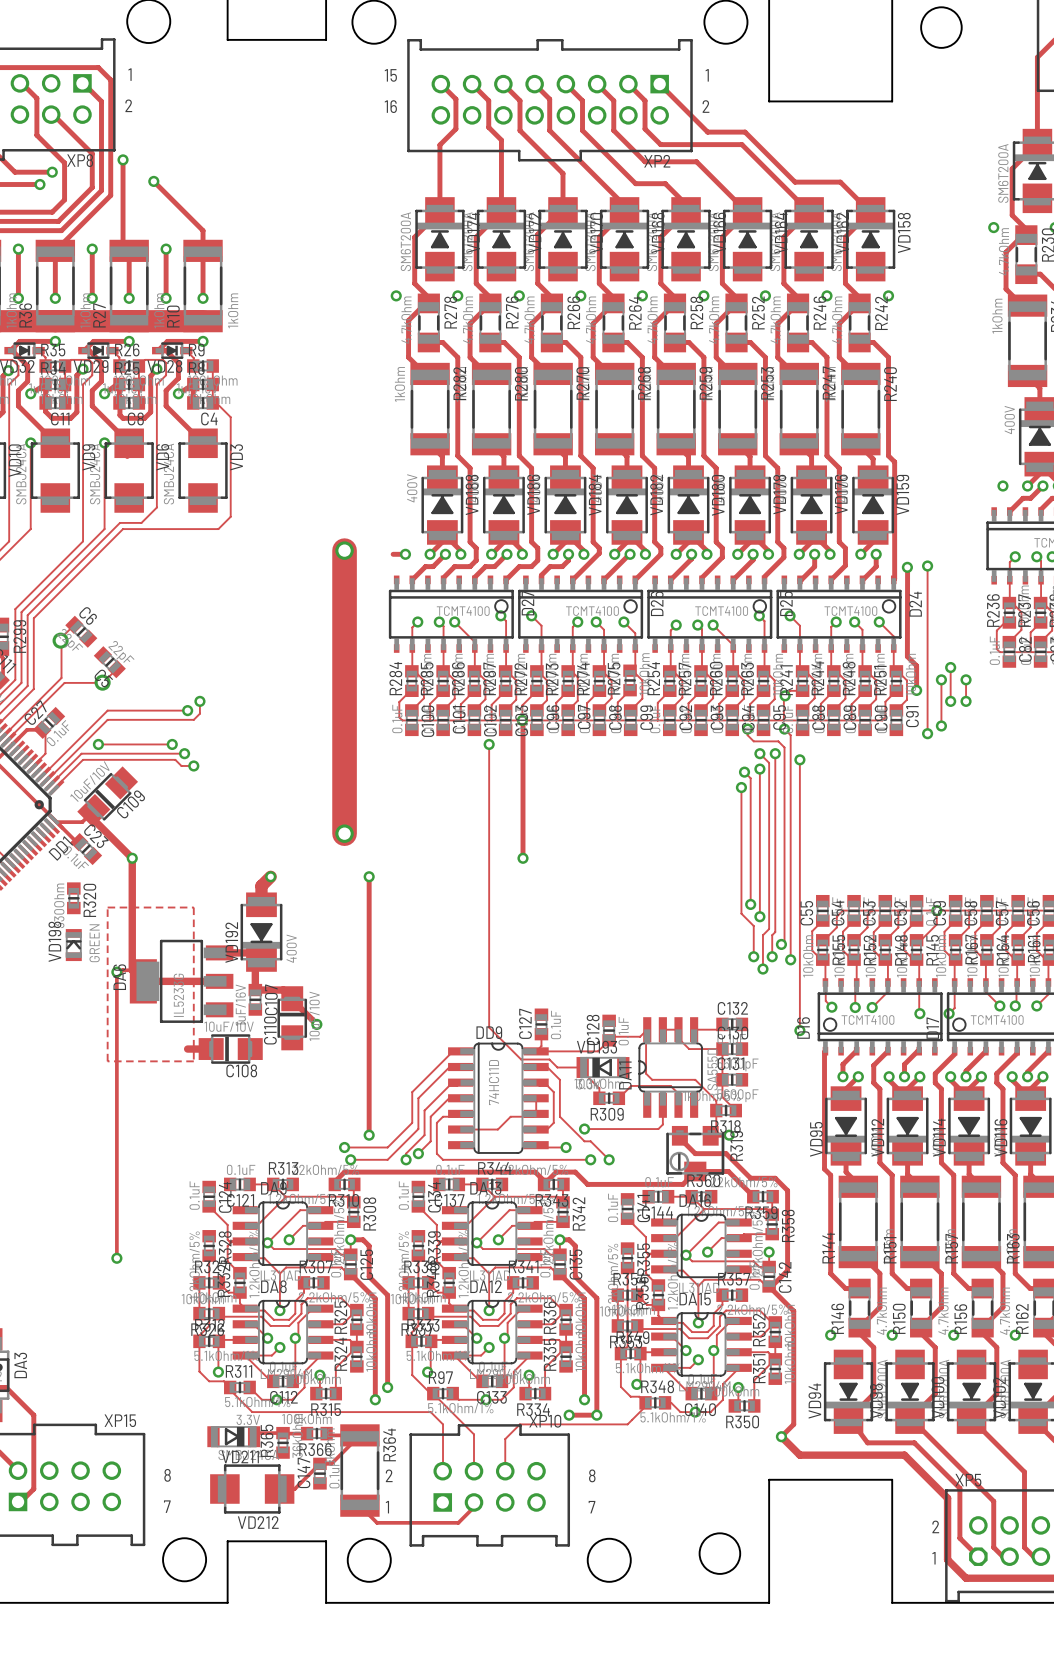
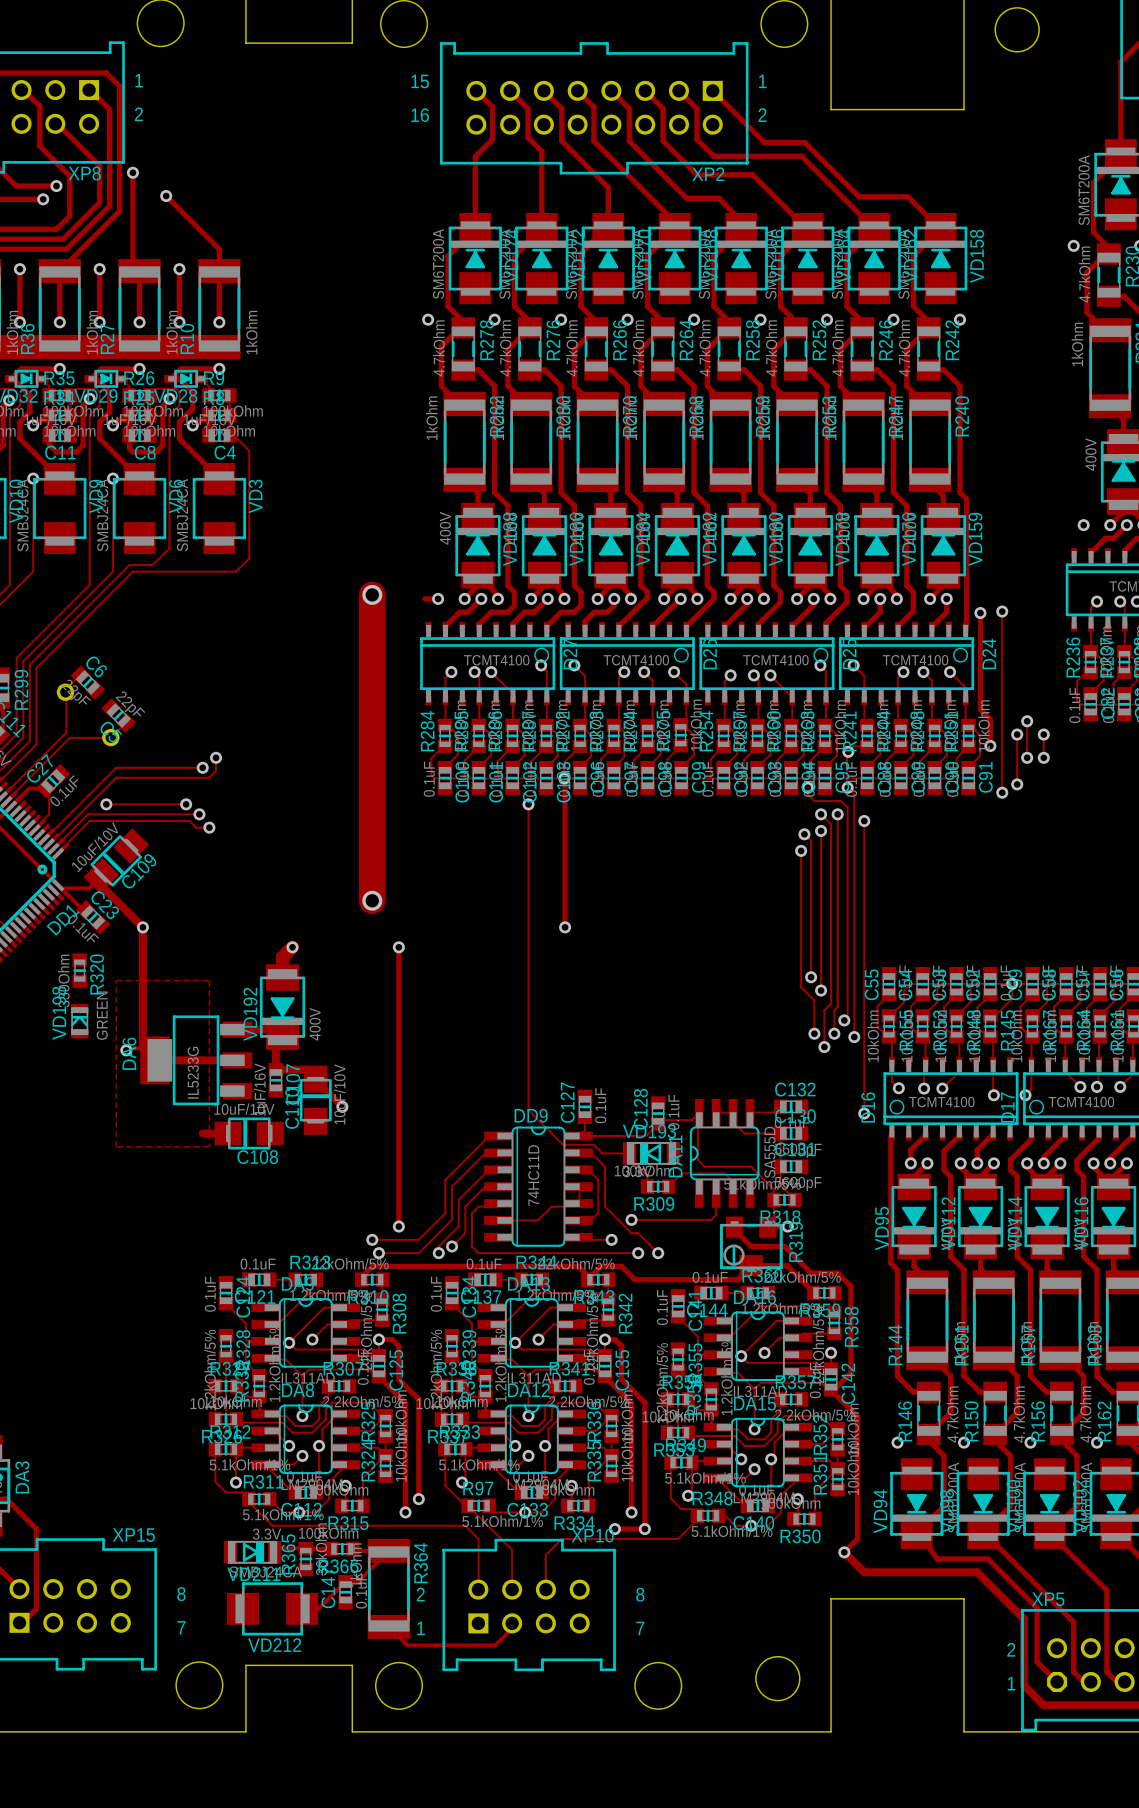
track: (123, 970) (116, 976) (116, 1258) -> none
via: (116, 1258) -> none

